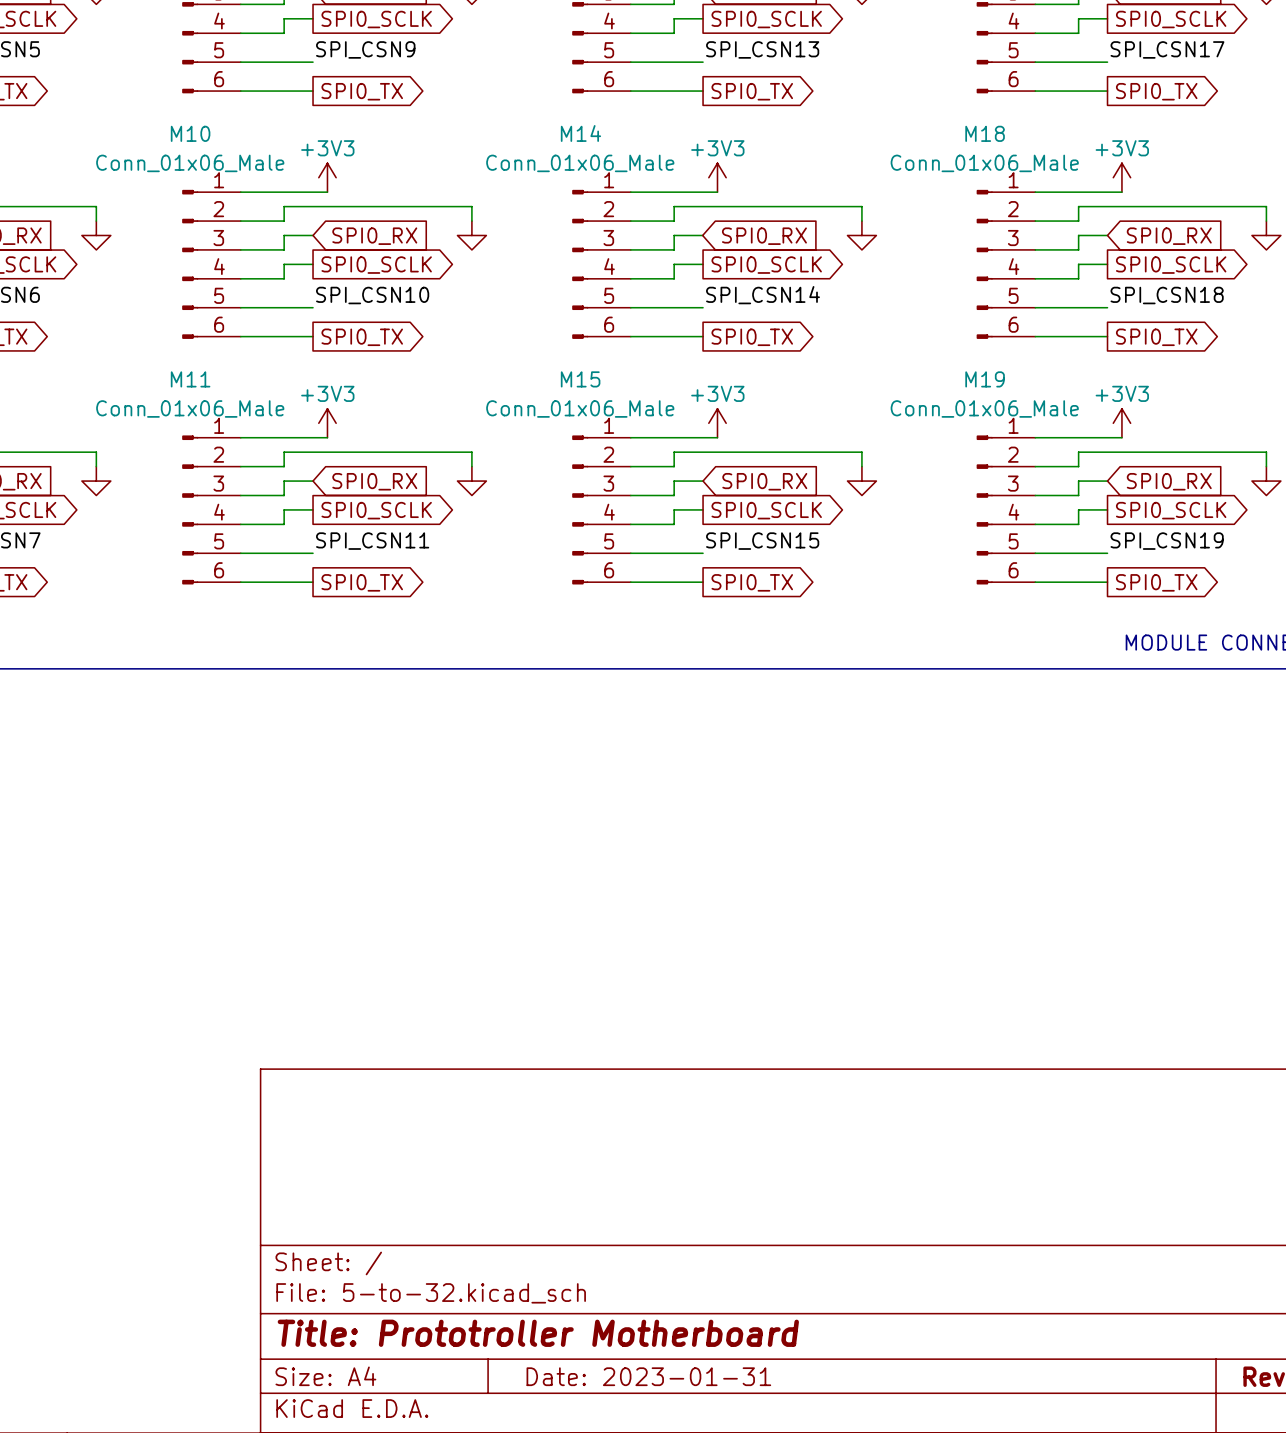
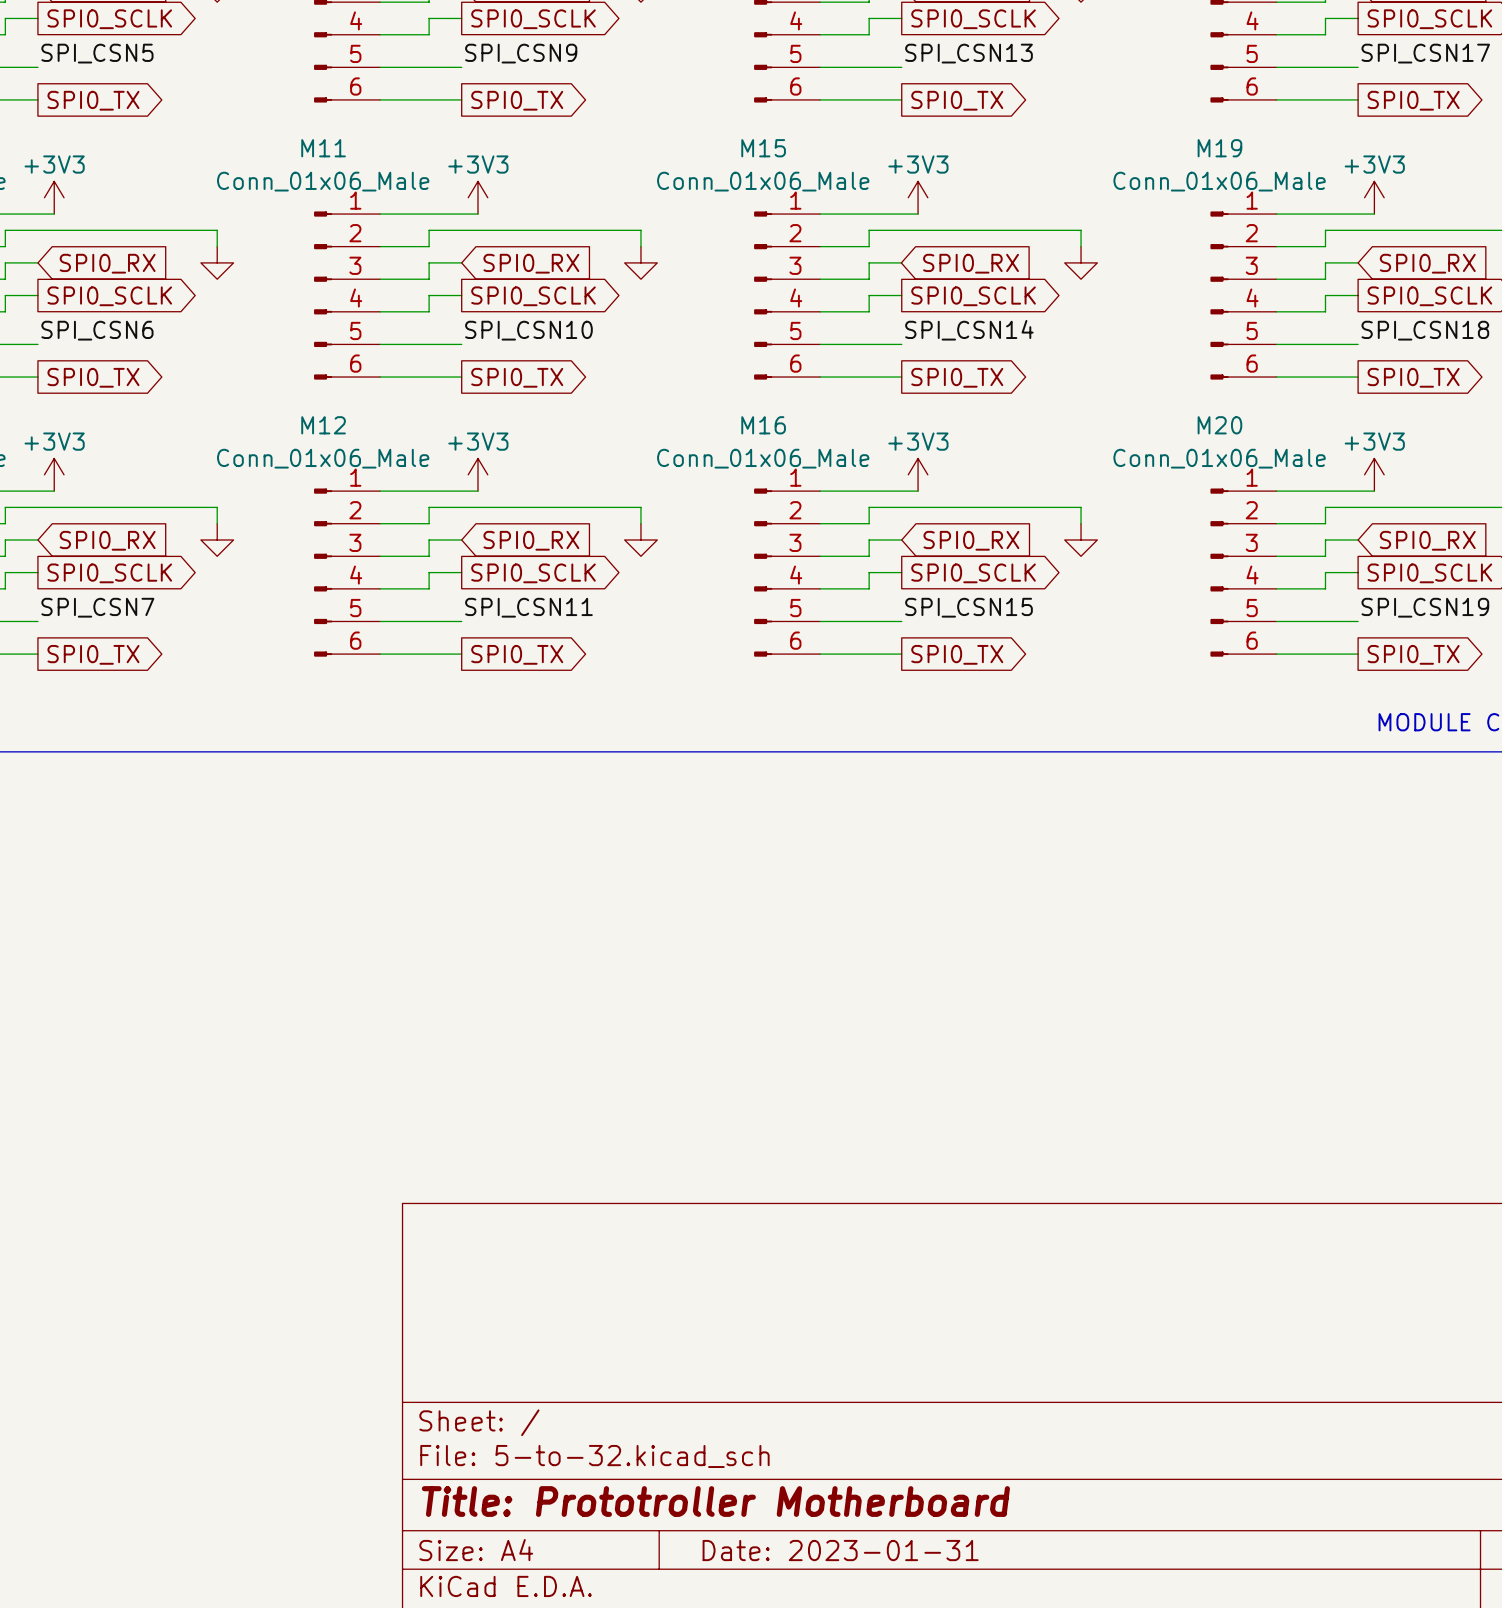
M10 name: M10 (190, 133) -> M11 (323, 148)
M14 name: M14 (580, 133) -> M15 (763, 148)
M18 name: M18 (985, 133) -> M19 (1219, 148)
M11 name: M11 (190, 379) -> M12 (323, 425)
M15 name: M15 (580, 379) -> M16 (763, 425)
M19 name: M19 (985, 379) -> M20 (1219, 425)

